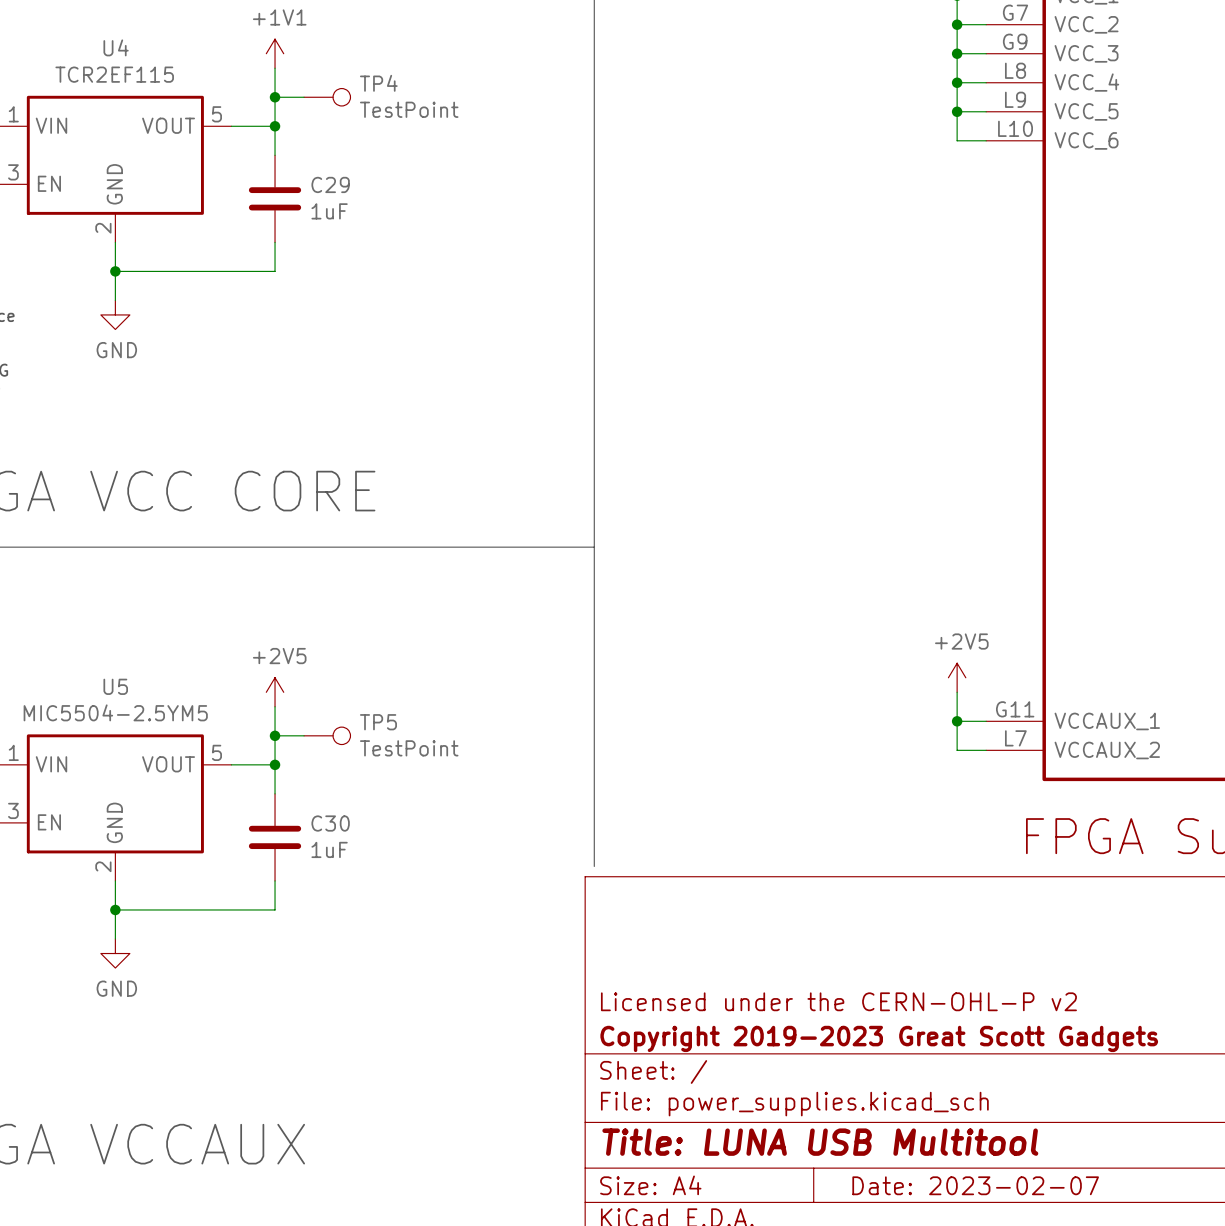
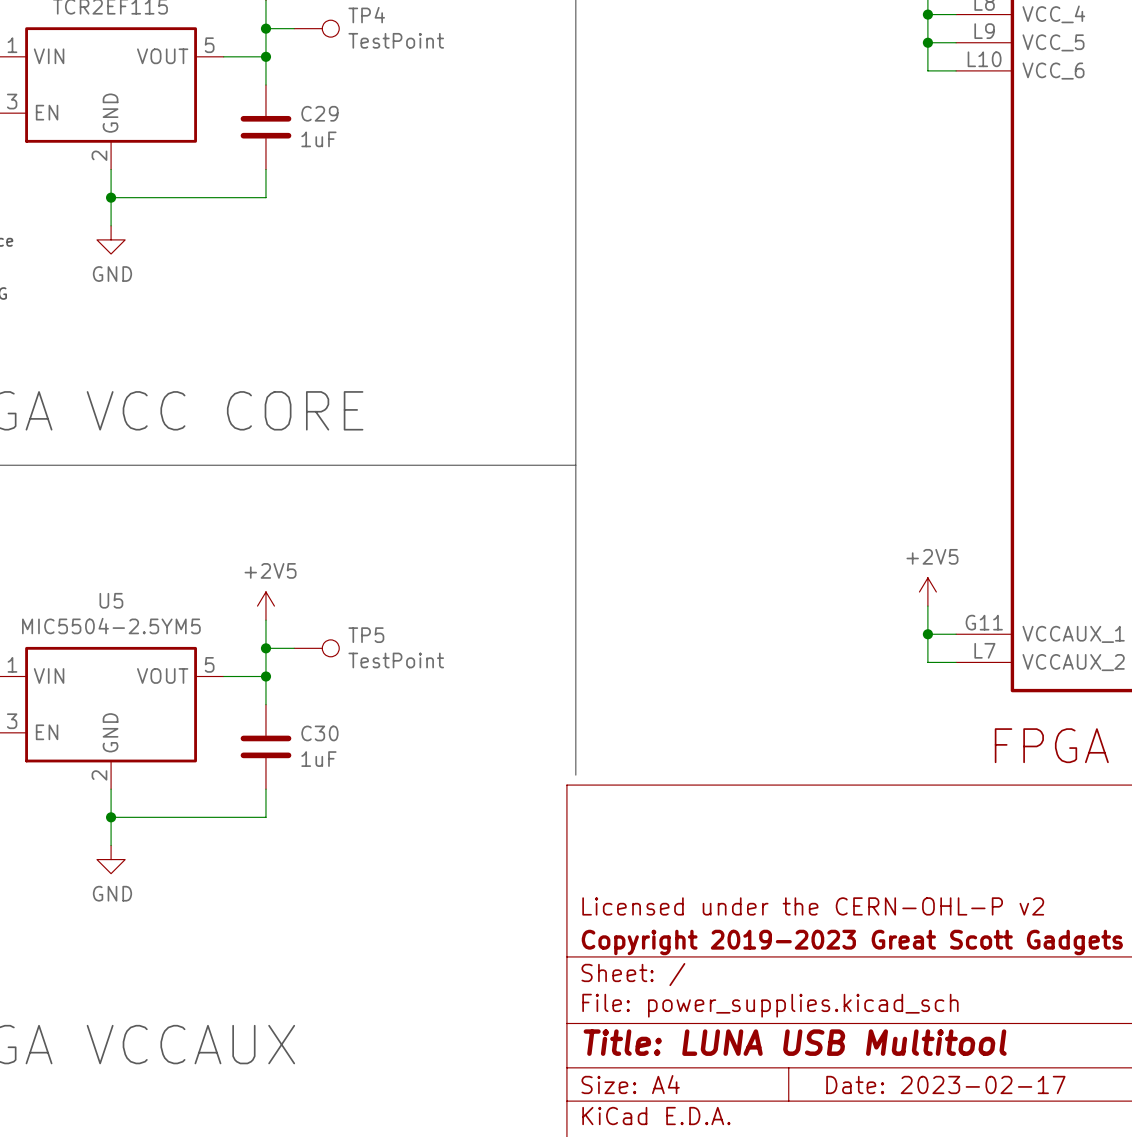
title block: Date: 2023-02-07 (975, 1185) -> Date: 2023-02-17 (945, 1084)

